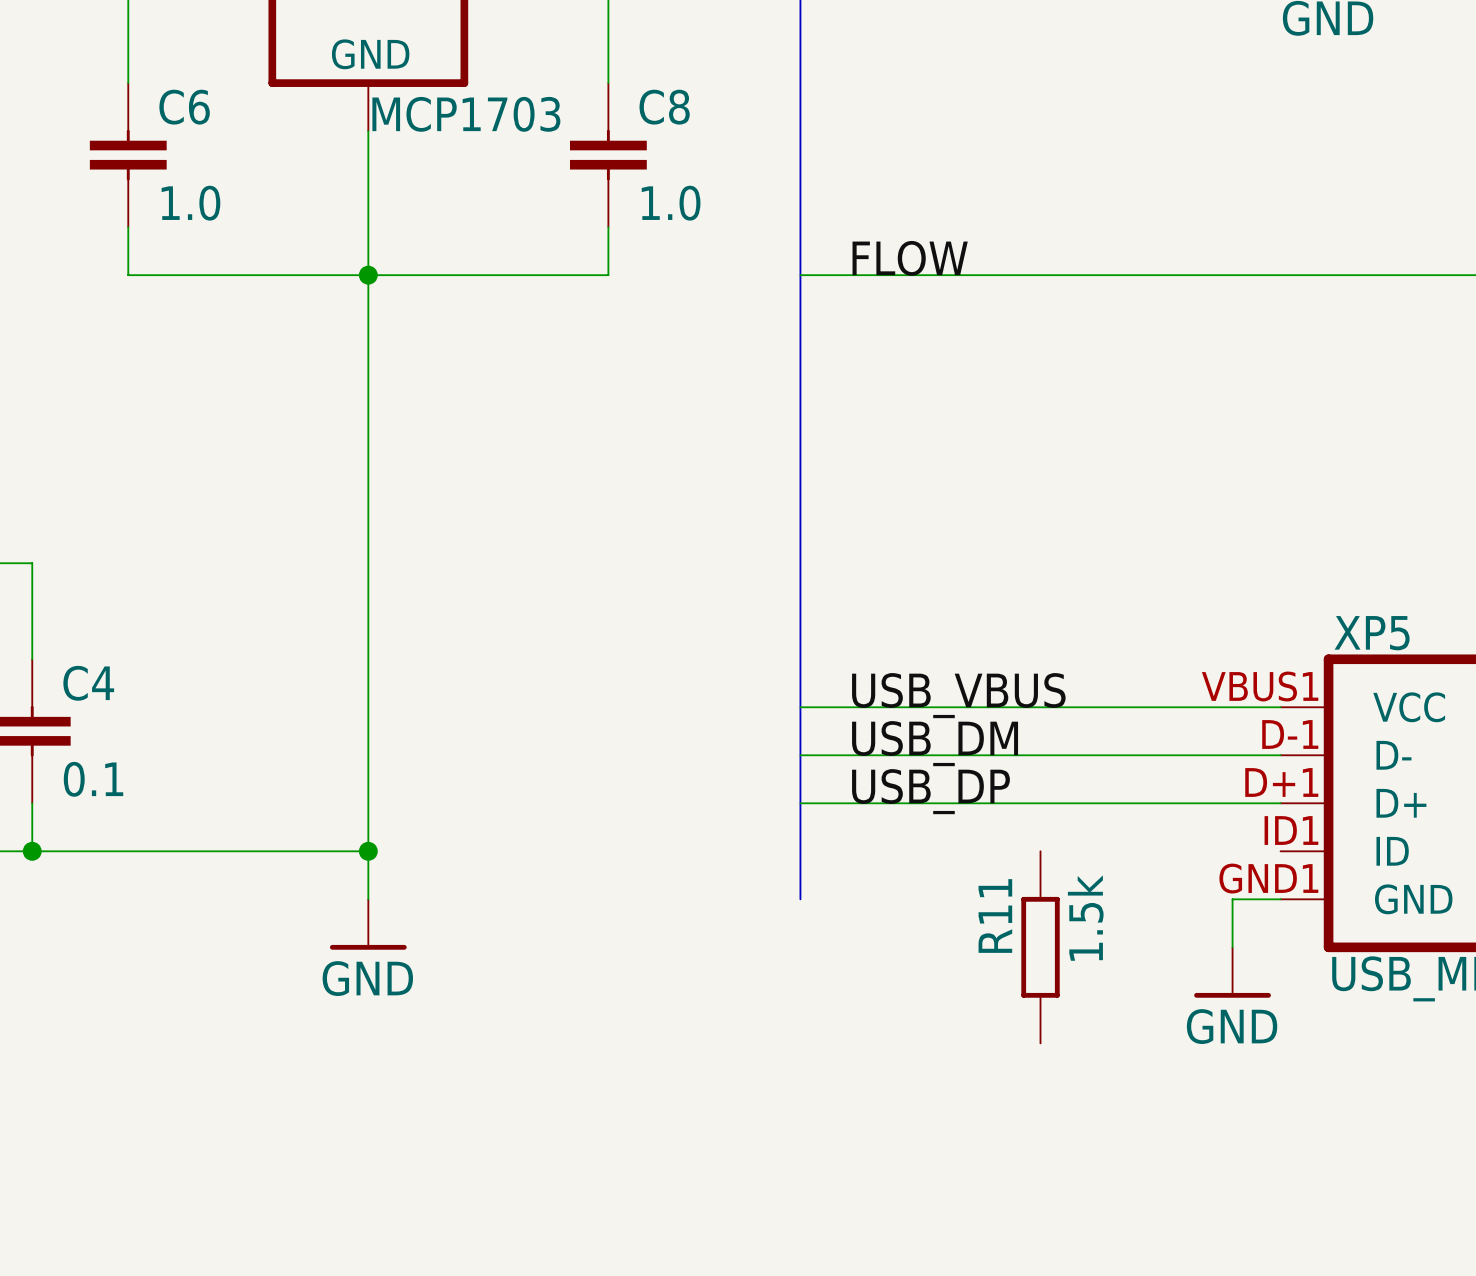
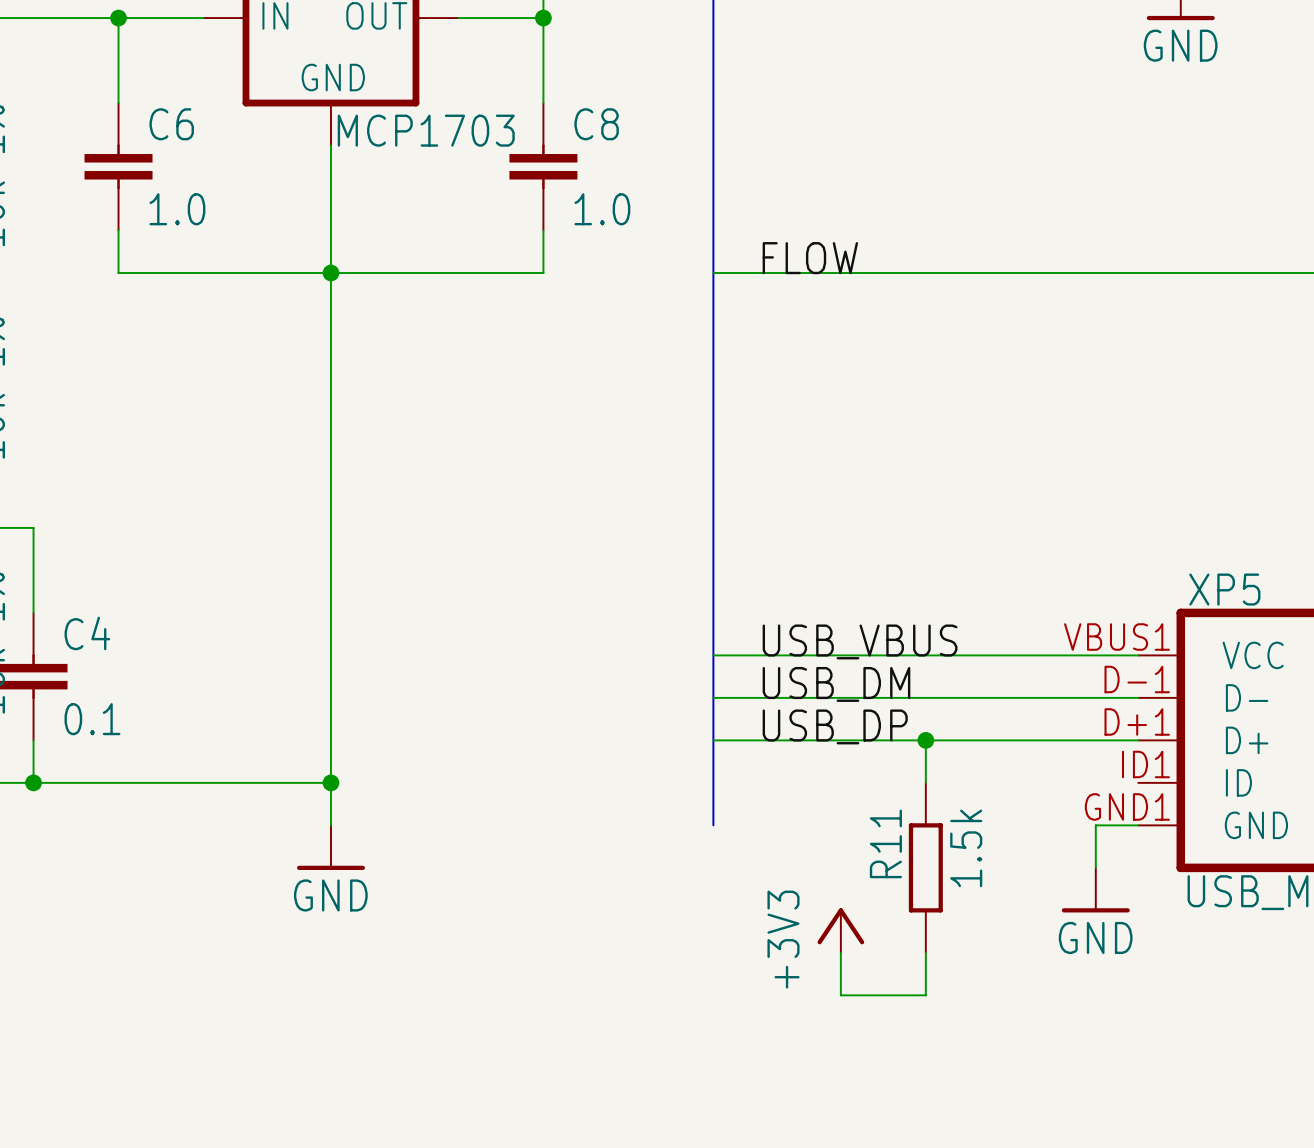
wire: none -> (925, 740) (925, 782)
junction: none -> (925, 740)
power symbol: none -> +3V3 (840, 930)
wire: none -> (840, 952) (840, 995) (925, 995) (925, 952)

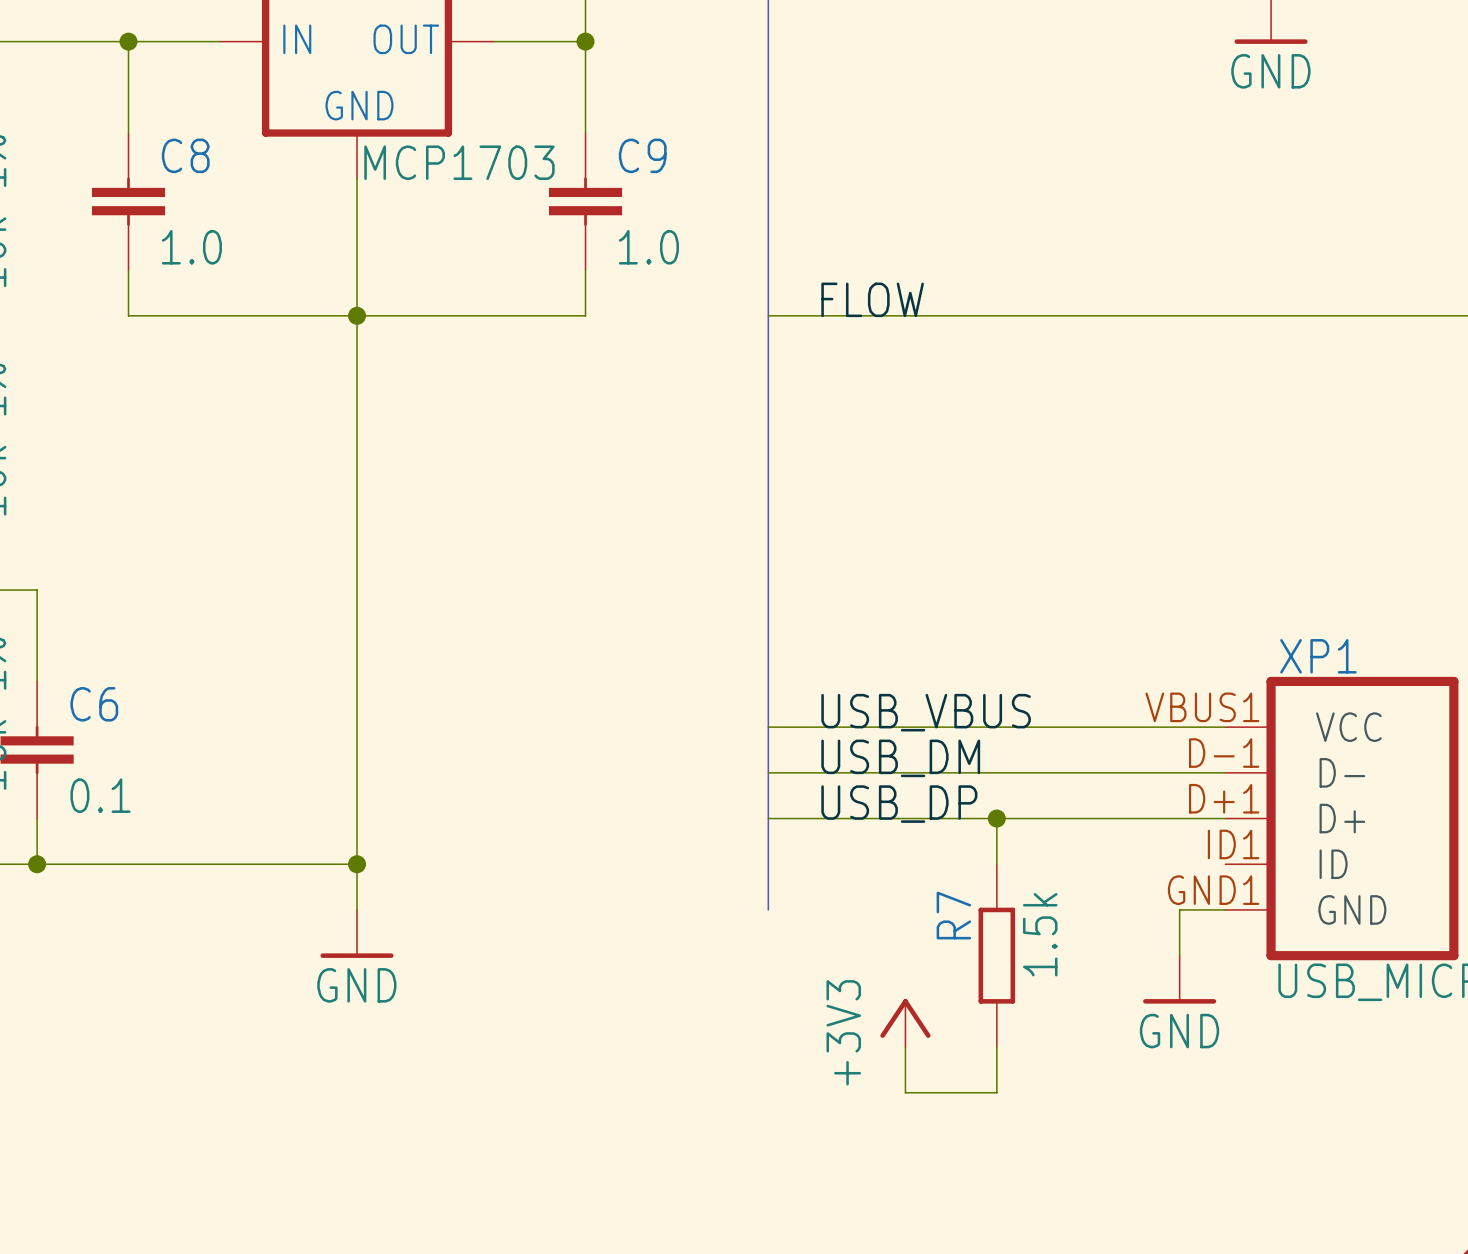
C6 name: C6 (171, 124) -> C8 (185, 155)
C8 name: C8 (596, 124) -> C9 (642, 155)
XP5 name: XP5 (1224, 589) -> XP1 (1318, 656)
C4 name: C4 (87, 633) -> C6 (94, 704)
R11 name: R11 (885, 843) -> R7 (953, 915)

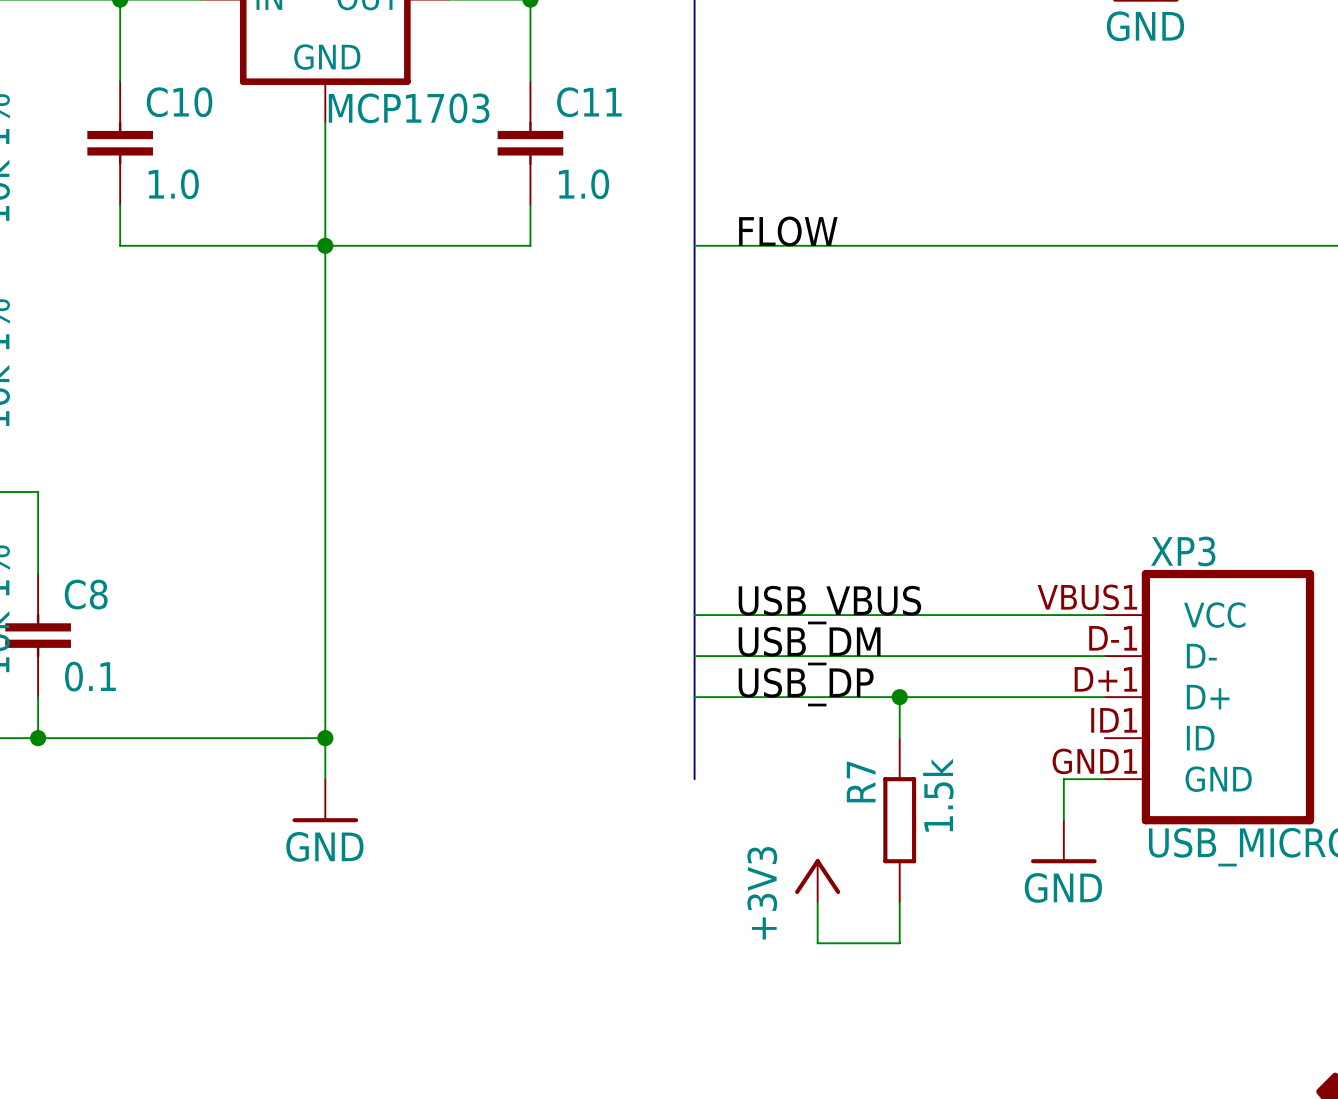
C8 name: C8 (185, 155) -> C10 (179, 102)
C9 name: C9 (642, 155) -> C11 (589, 102)
XP1 name: XP1 (1318, 656) -> XP3 (1183, 551)
C6 name: C6 (94, 704) -> C8 (86, 594)

